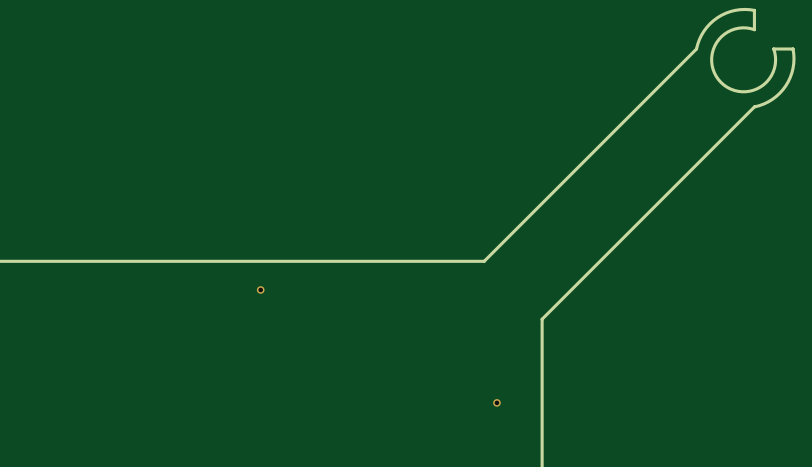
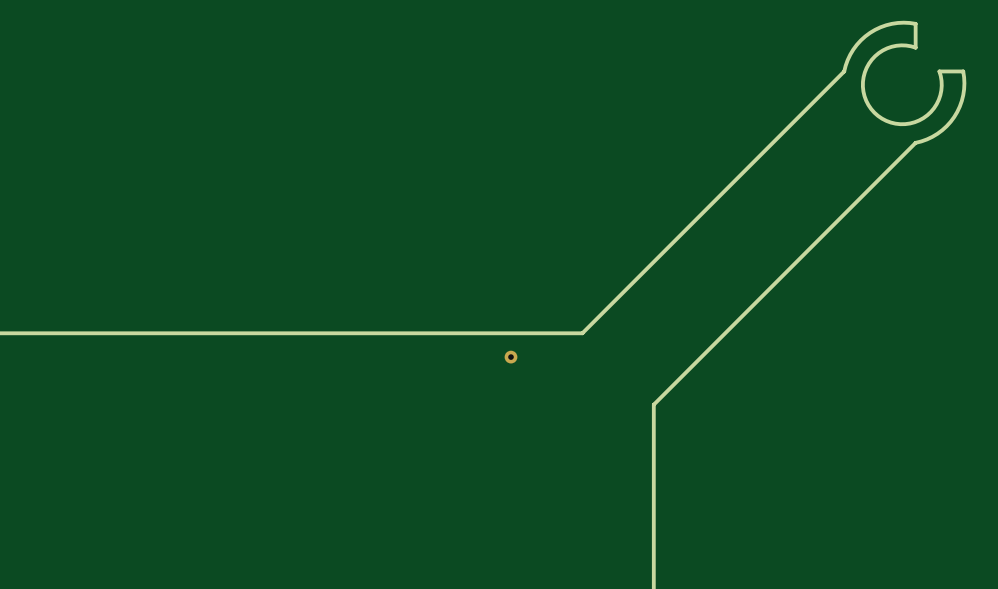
via: none -> (511, 357)
via: (260, 289) -> none
via: (496, 402) -> none

